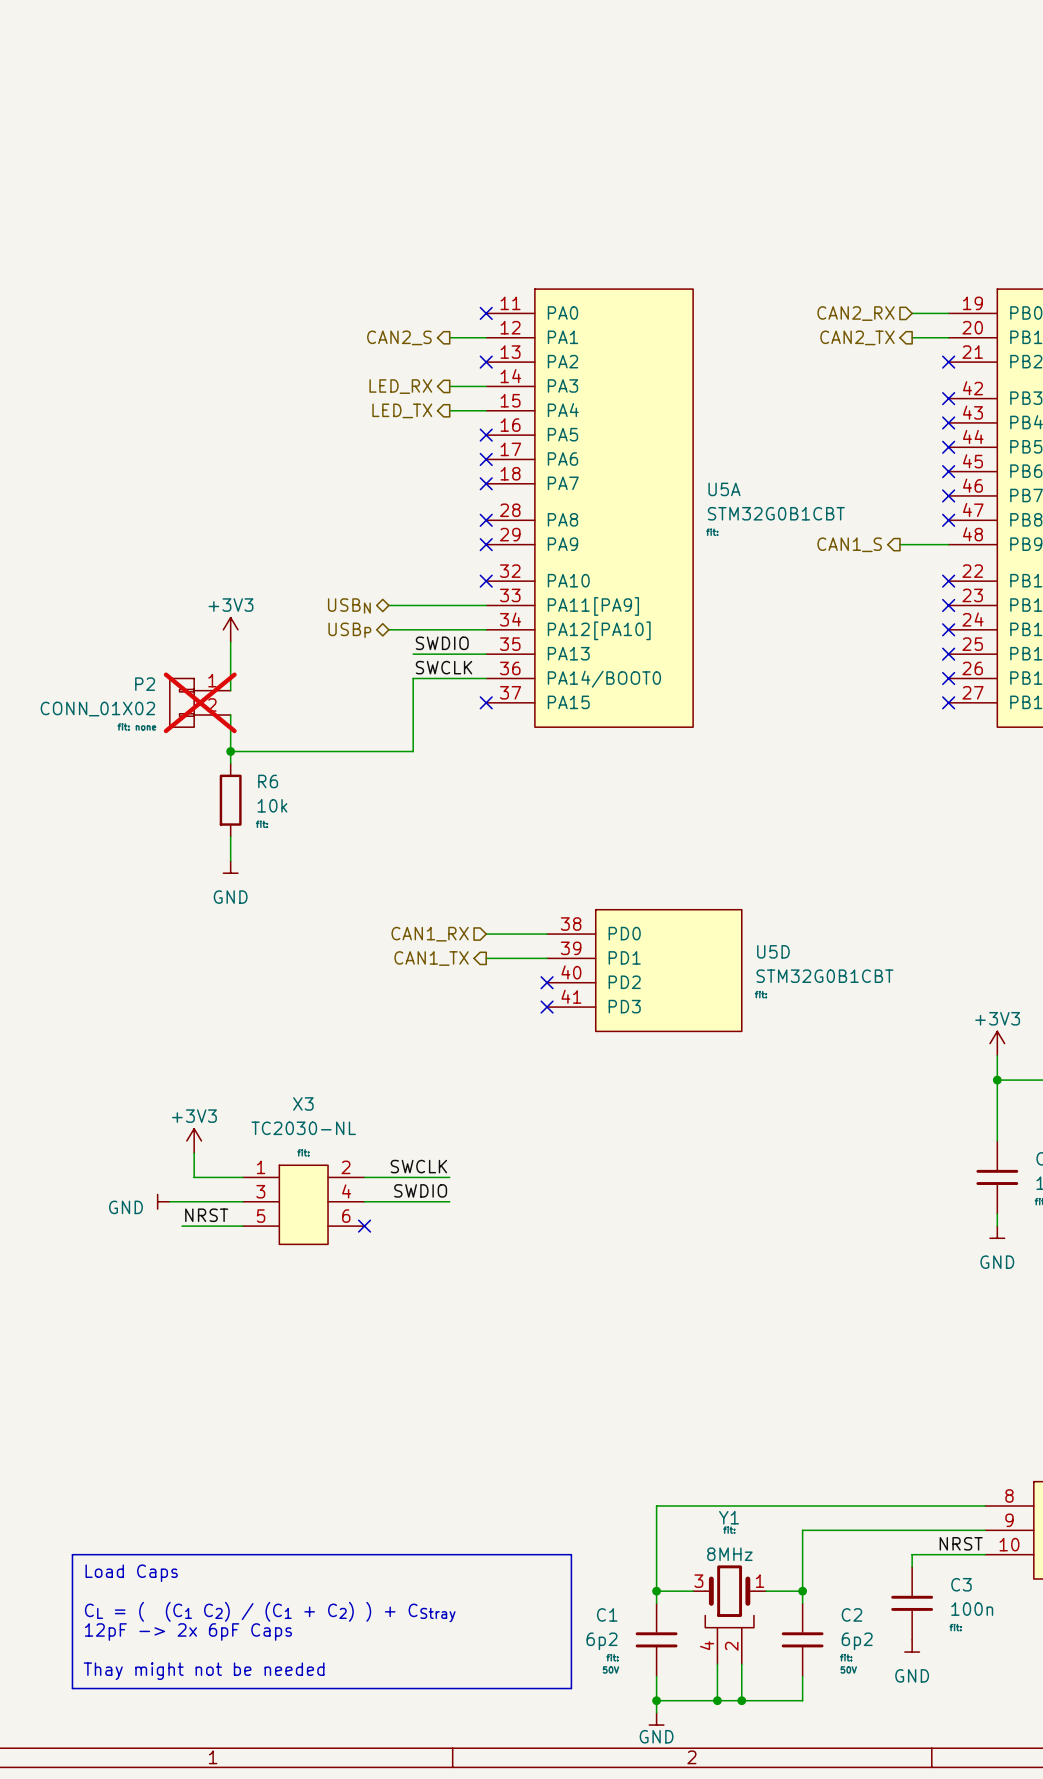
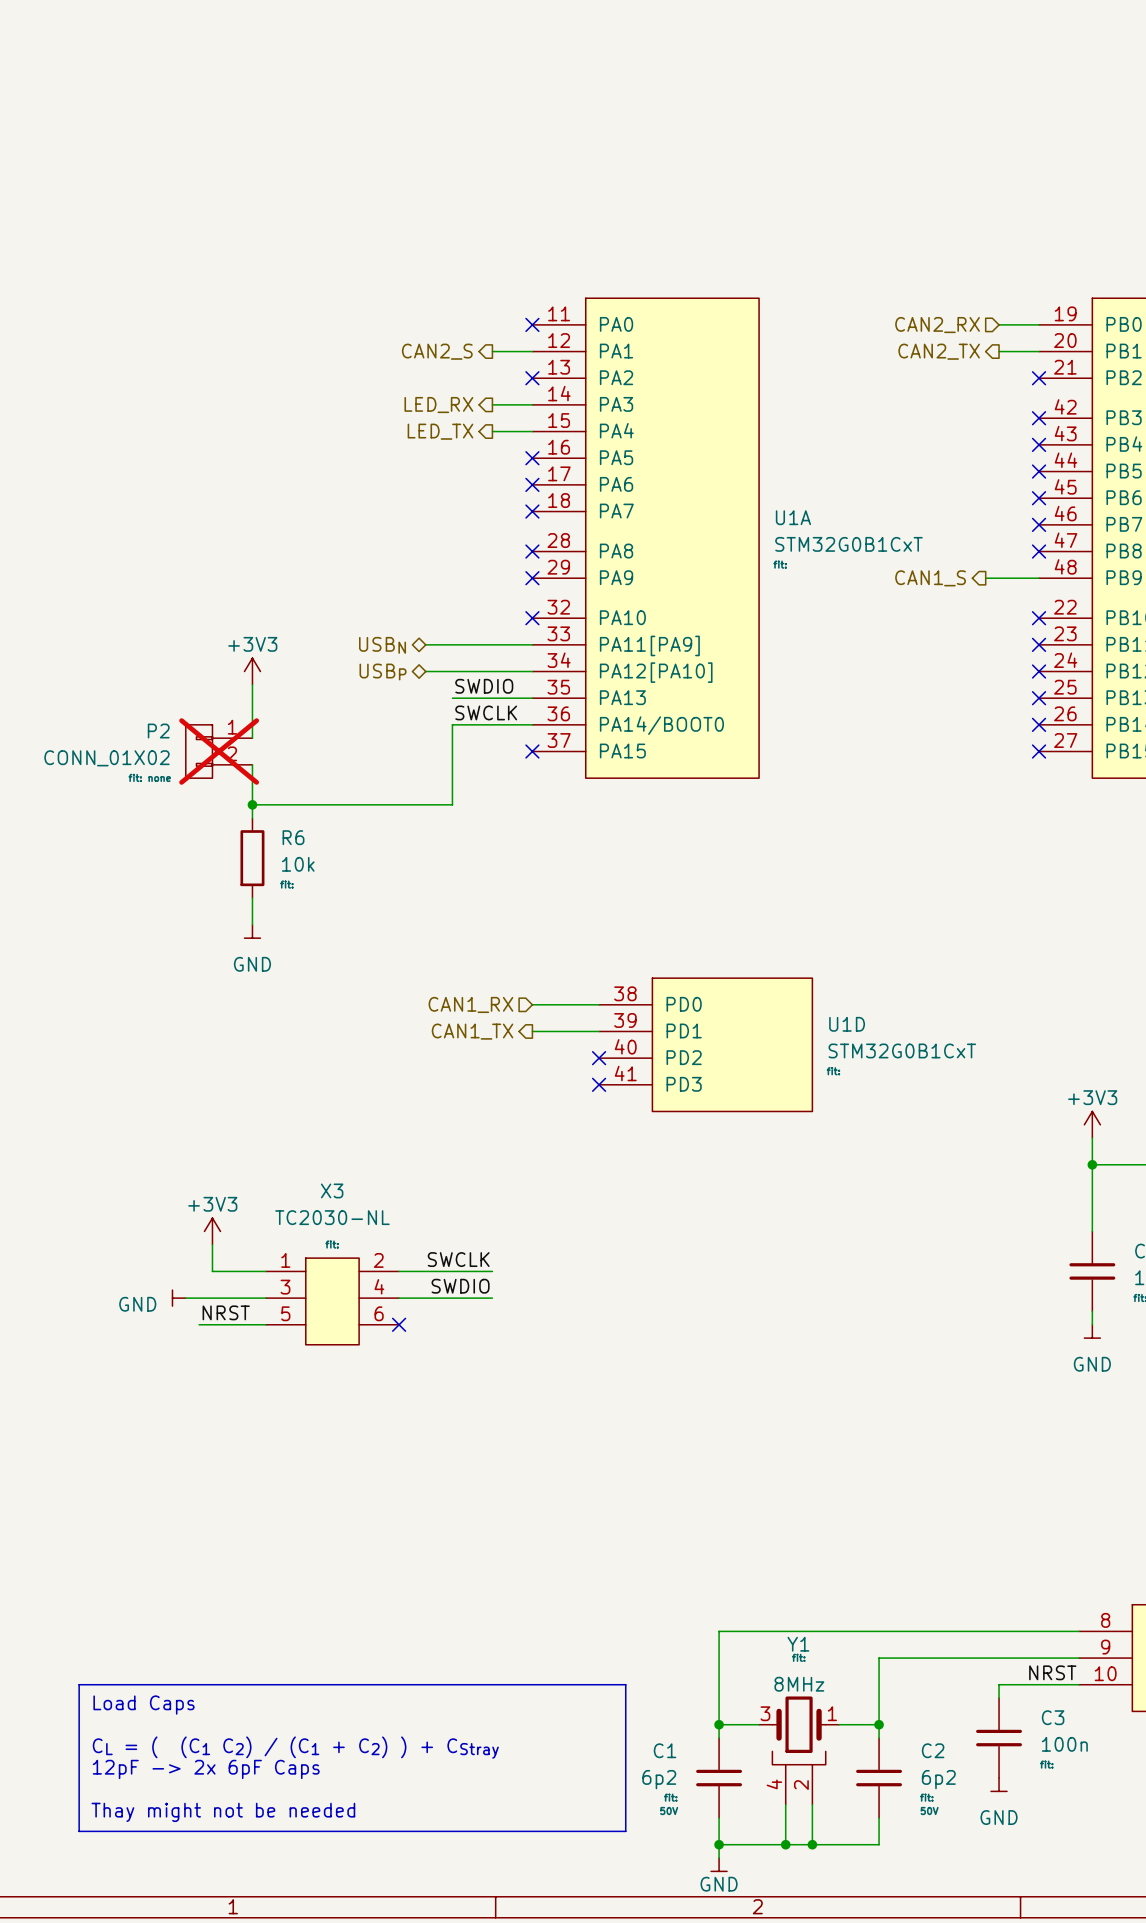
U5A name: U5A (724, 489) -> U1A (793, 517)
U5A value: STM32G0B1CBT (776, 513) -> STM32G0B1CxT (848, 544)
U5D name: U5D (773, 951) -> U1D (847, 1024)
U5D value: STM32G0B1CBT (825, 976) -> STM32G0B1CxT (902, 1050)

